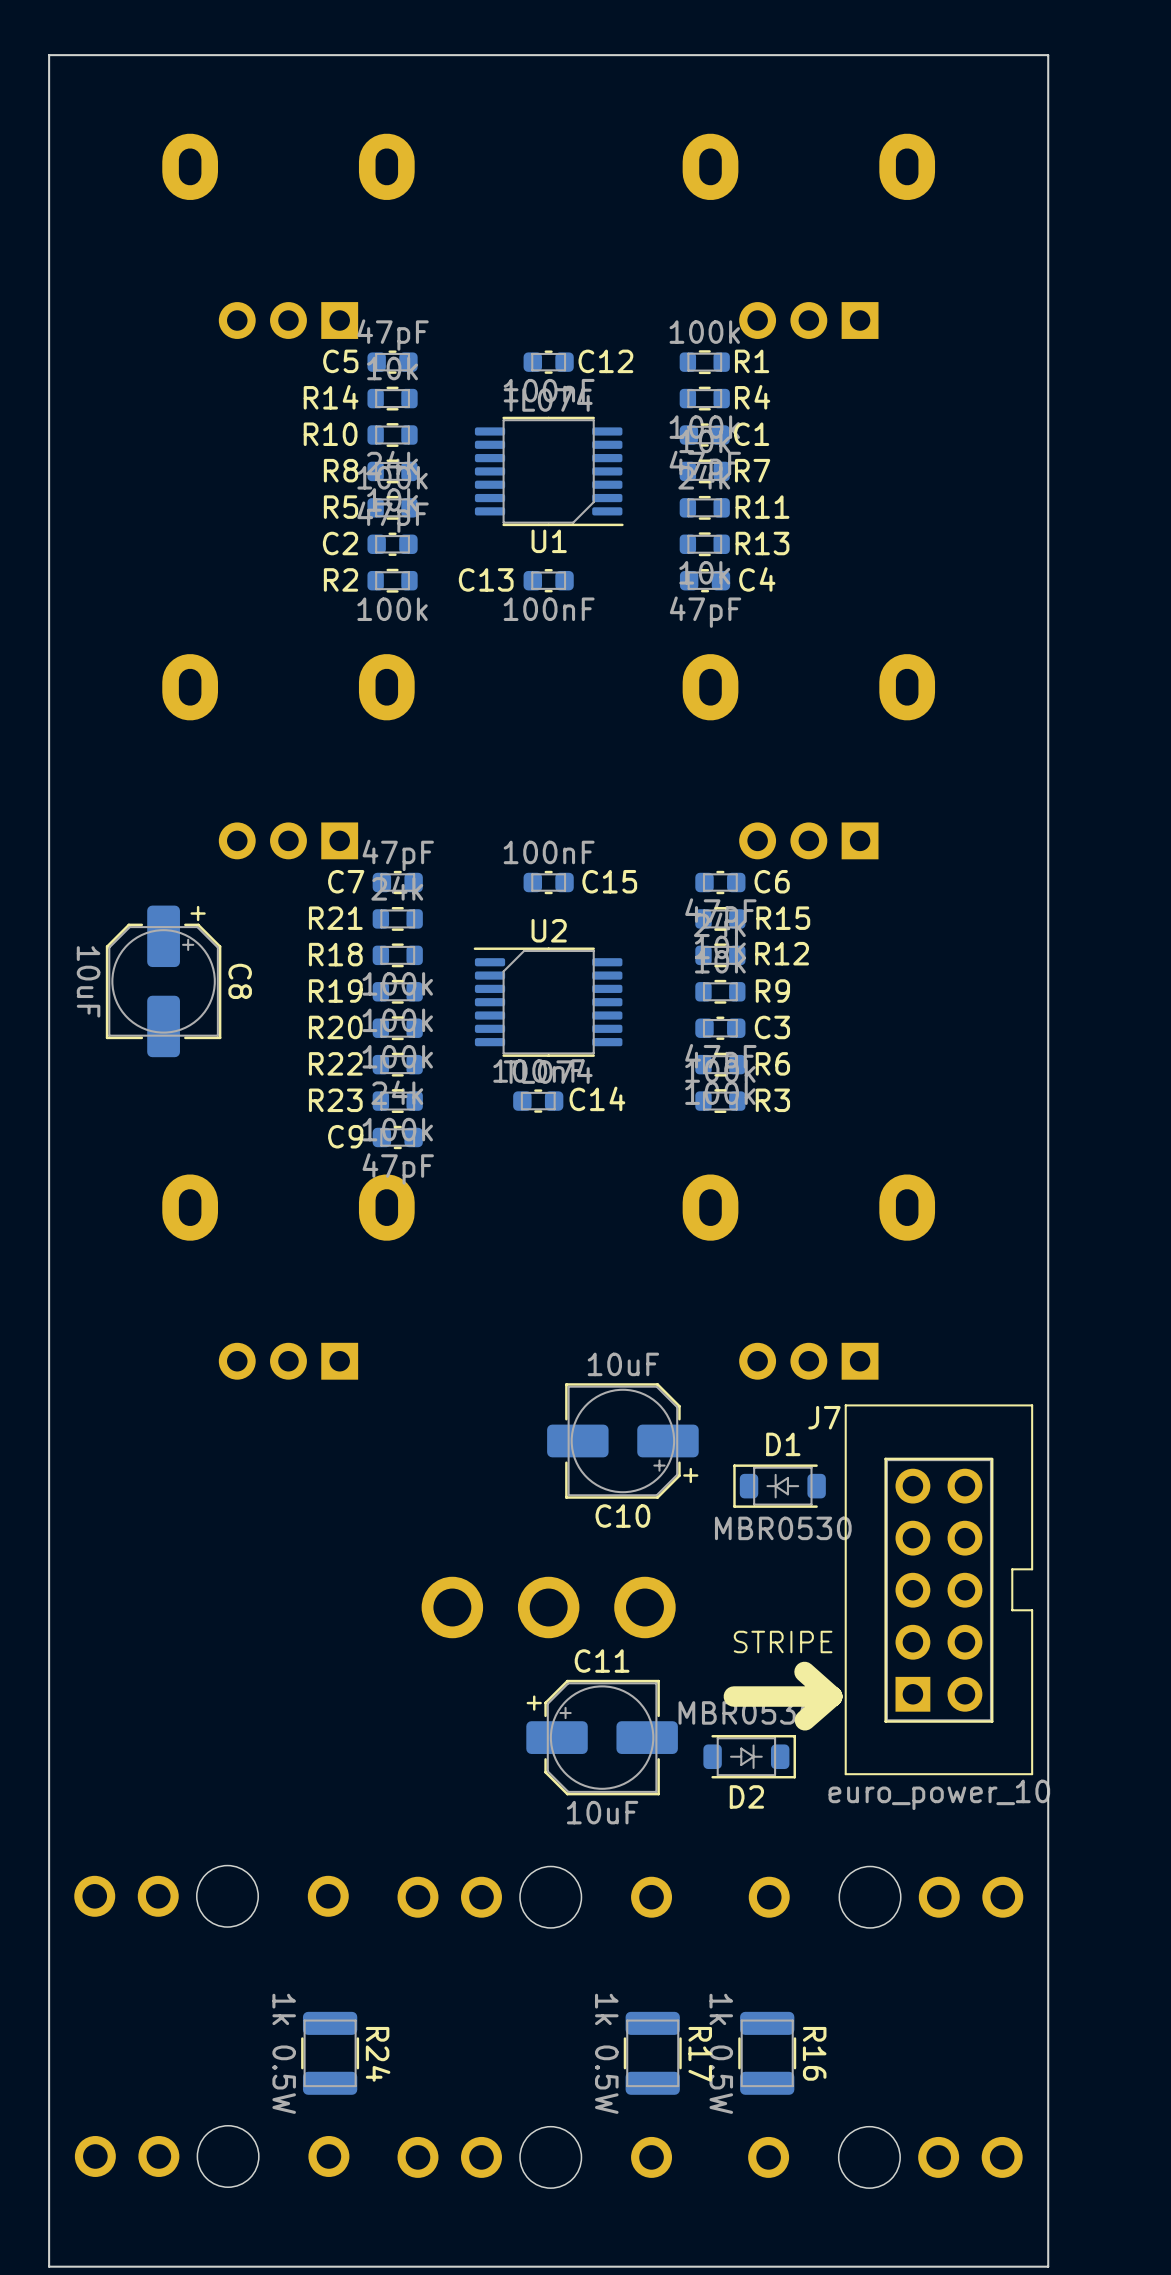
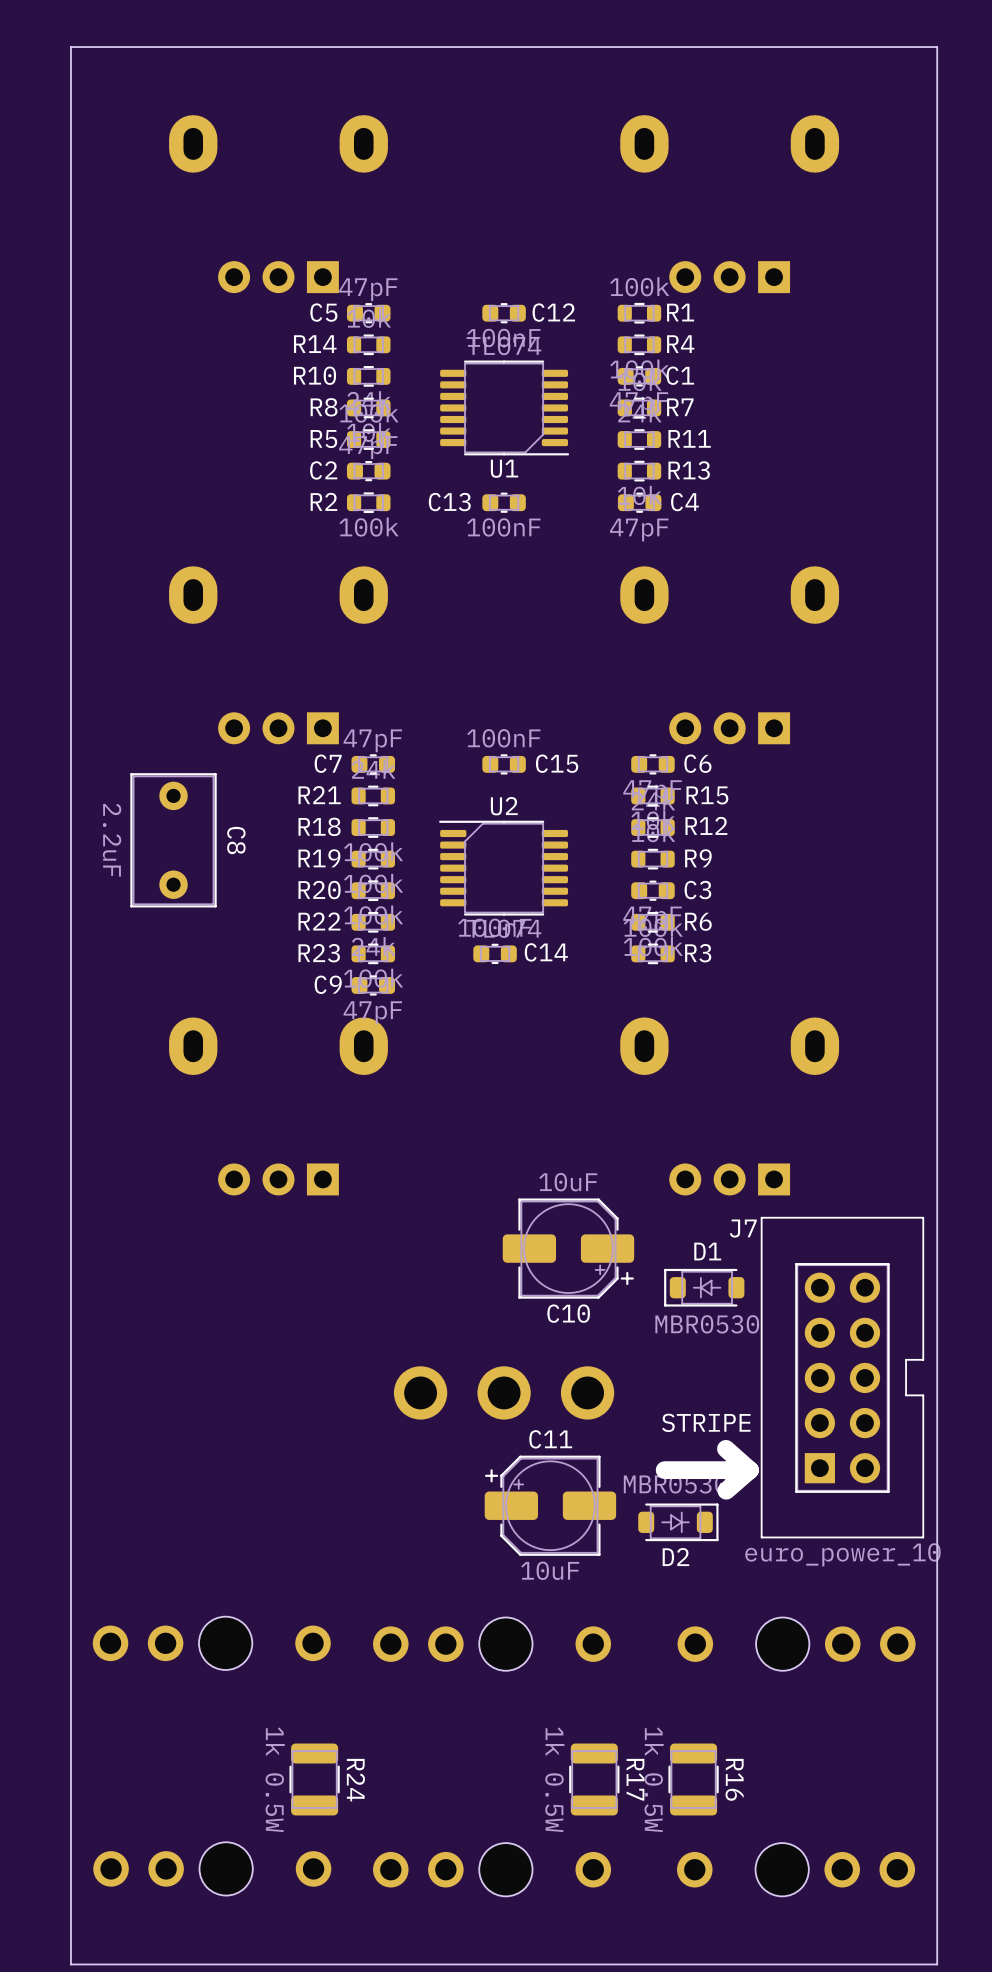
C8 footprint: [105, 905, 222, 1058] -> [130, 773, 217, 908]
C8 value: 10uF (88, 981) -> 2.2uF (112, 840)

